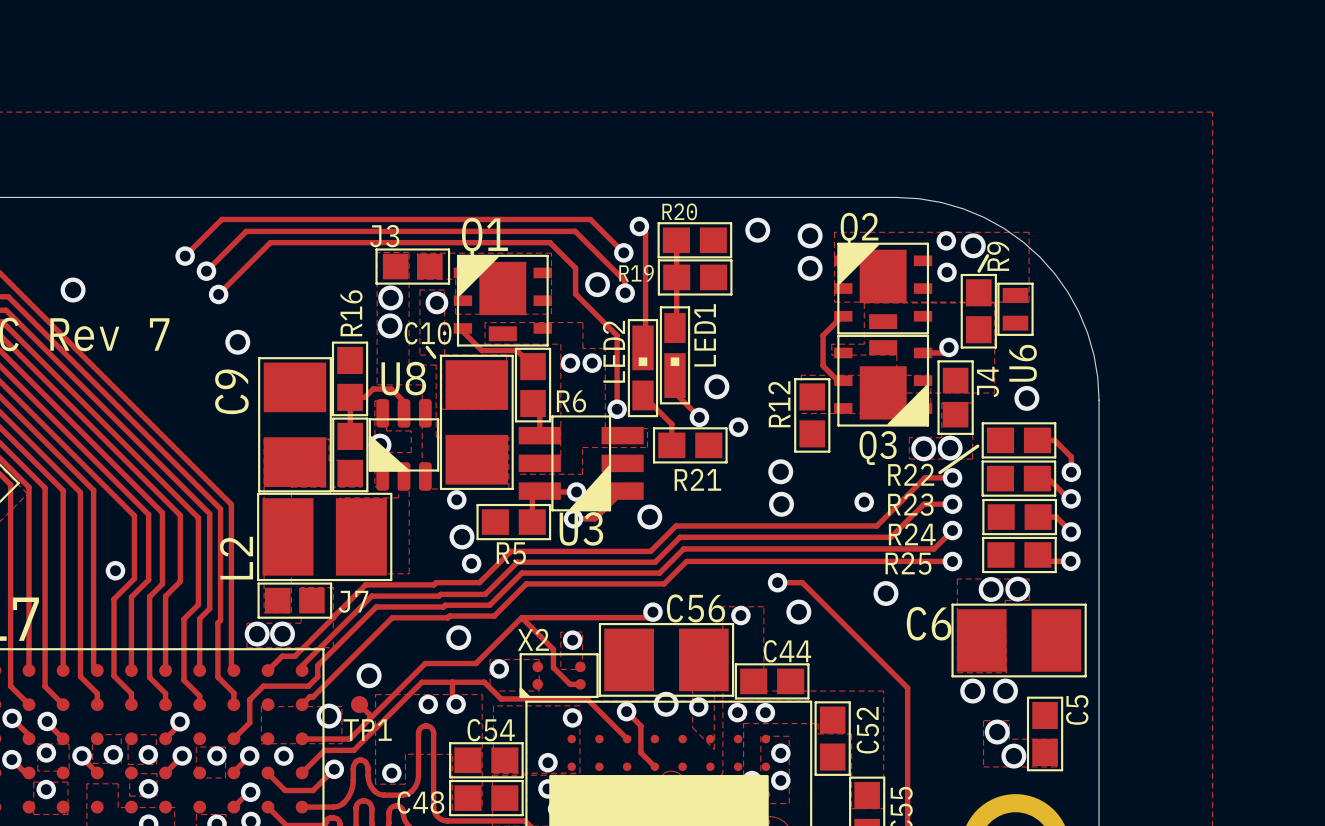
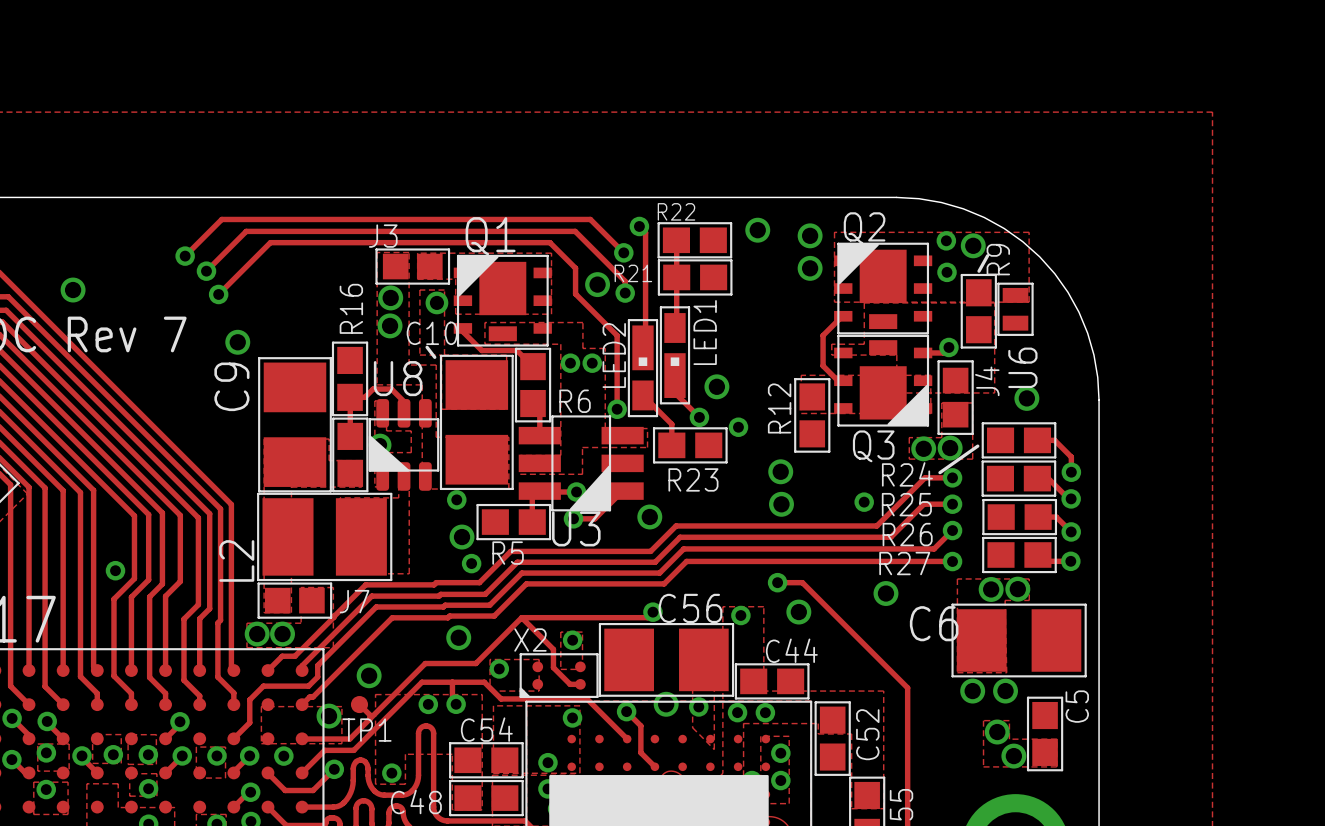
R20 name: R20 (679, 211) -> R22 (676, 211)
R19 name: R19 (636, 273) -> R21 (633, 273)
R22 name: R22 (911, 474) -> R24 (907, 474)
R21 name: R21 (697, 479) -> R23 (693, 479)
R23 name: R23 (910, 504) -> R25 (906, 504)
R24 name: R24 (912, 534) -> R26 (907, 534)
R25 name: R25 (908, 563) -> R27 (904, 563)

